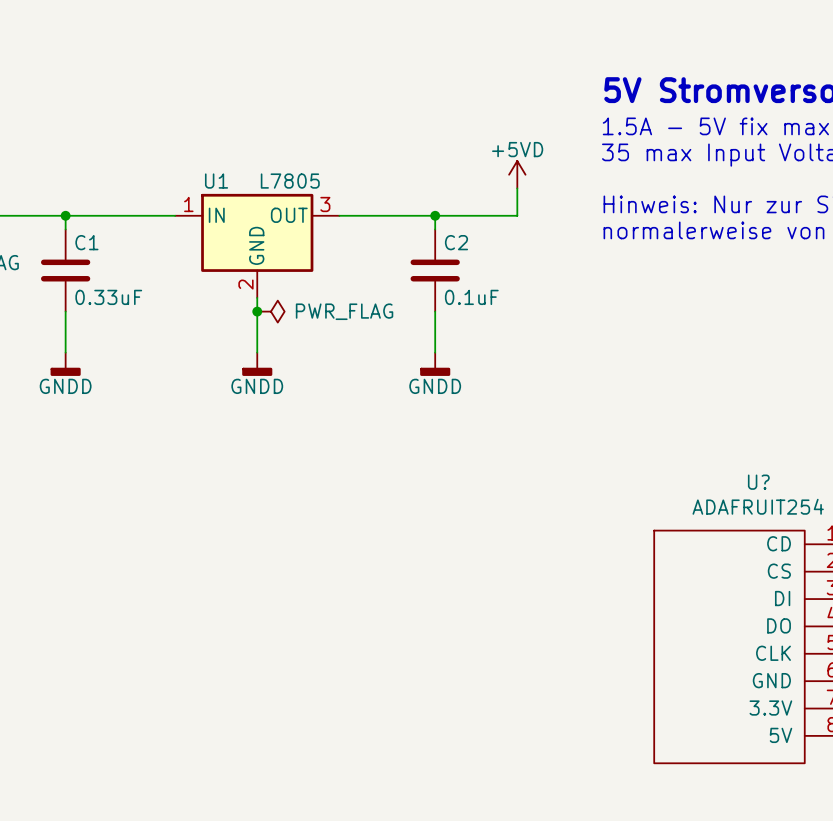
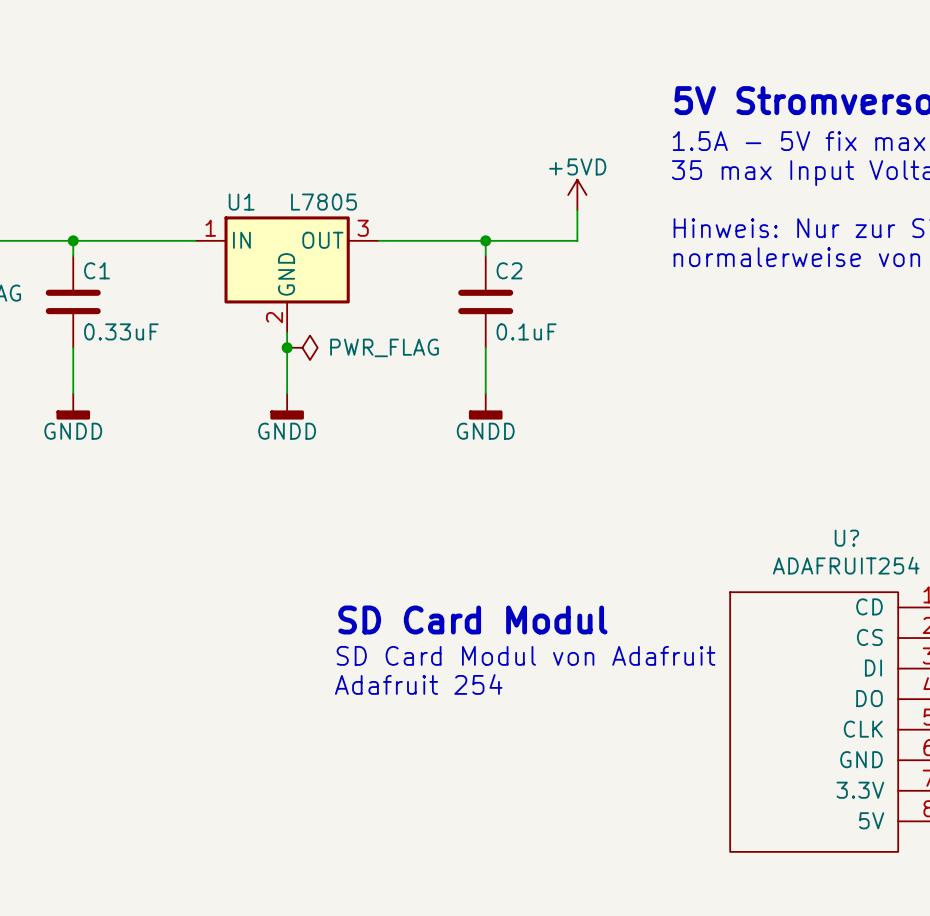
text: none -> SD Card Modul (472, 620)
text: none -> SD Card Modul von Adafruit (526, 655)
text: none -> Adafruit 254 (418, 684)

